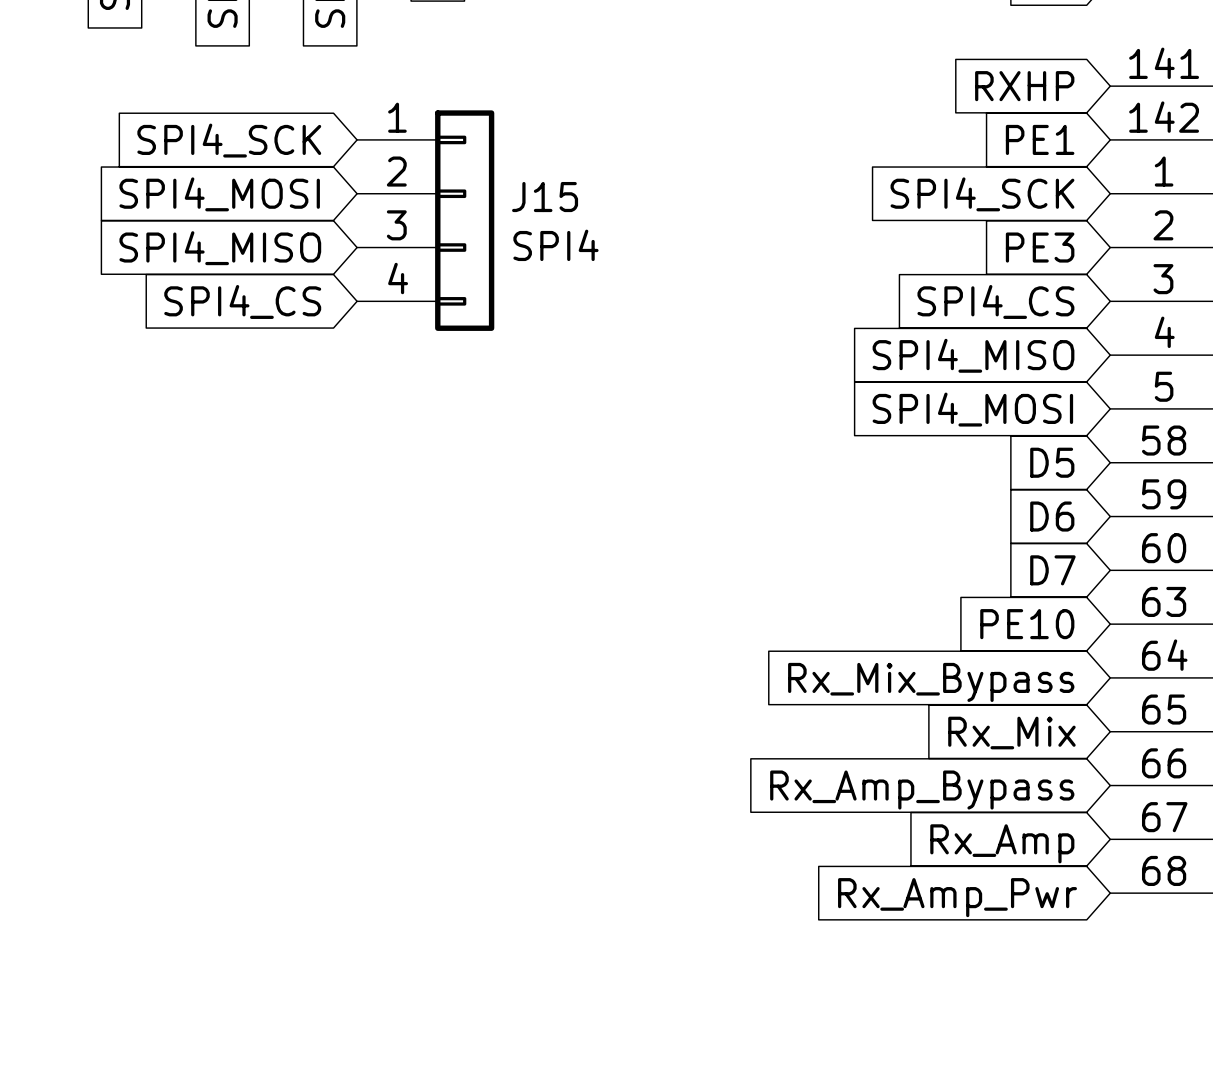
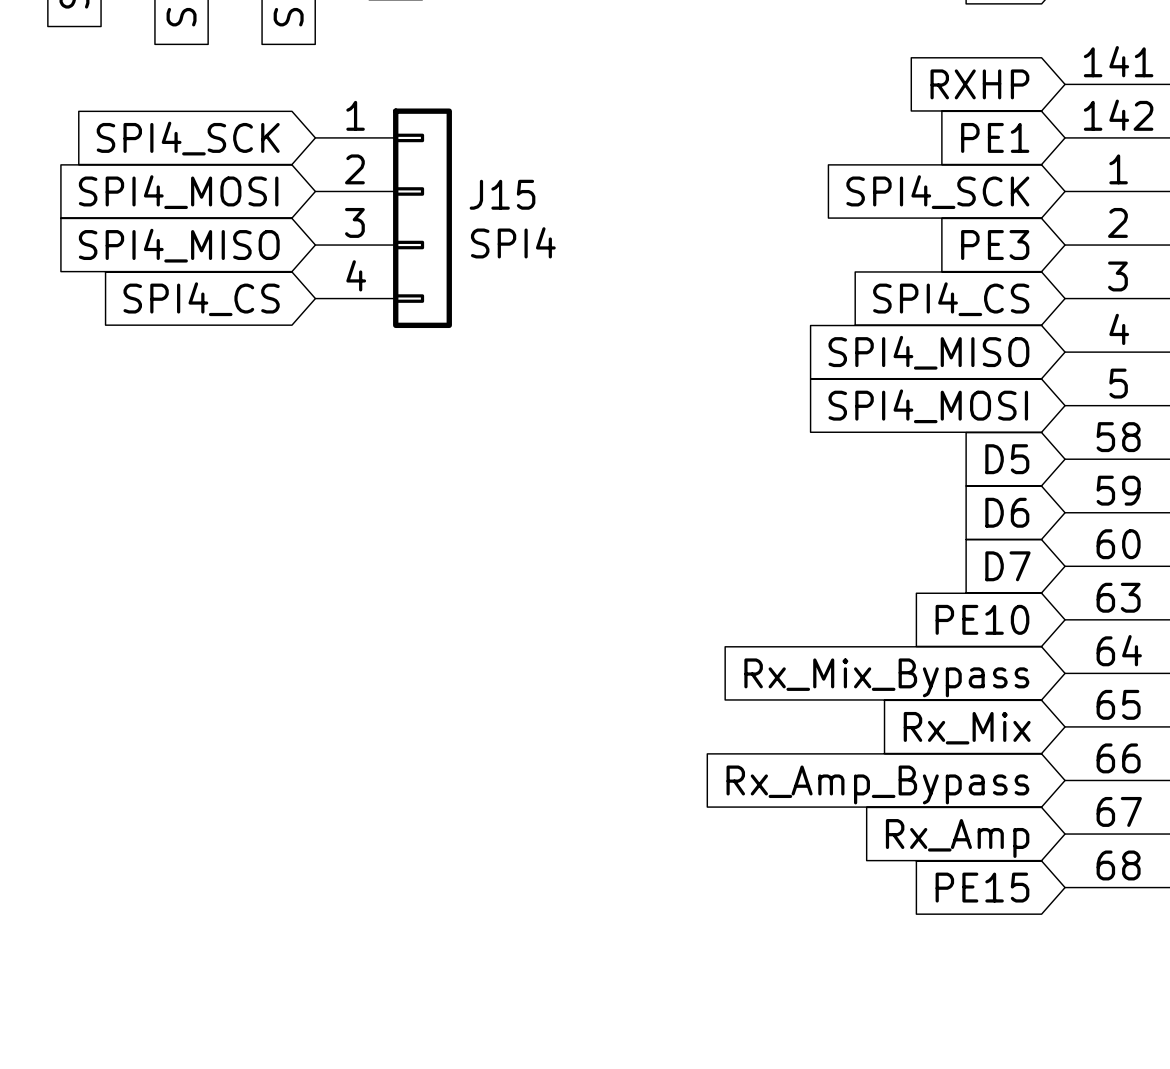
global label: Rx_Amp_Pwr (957, 897) -> PE15 (982, 887)

